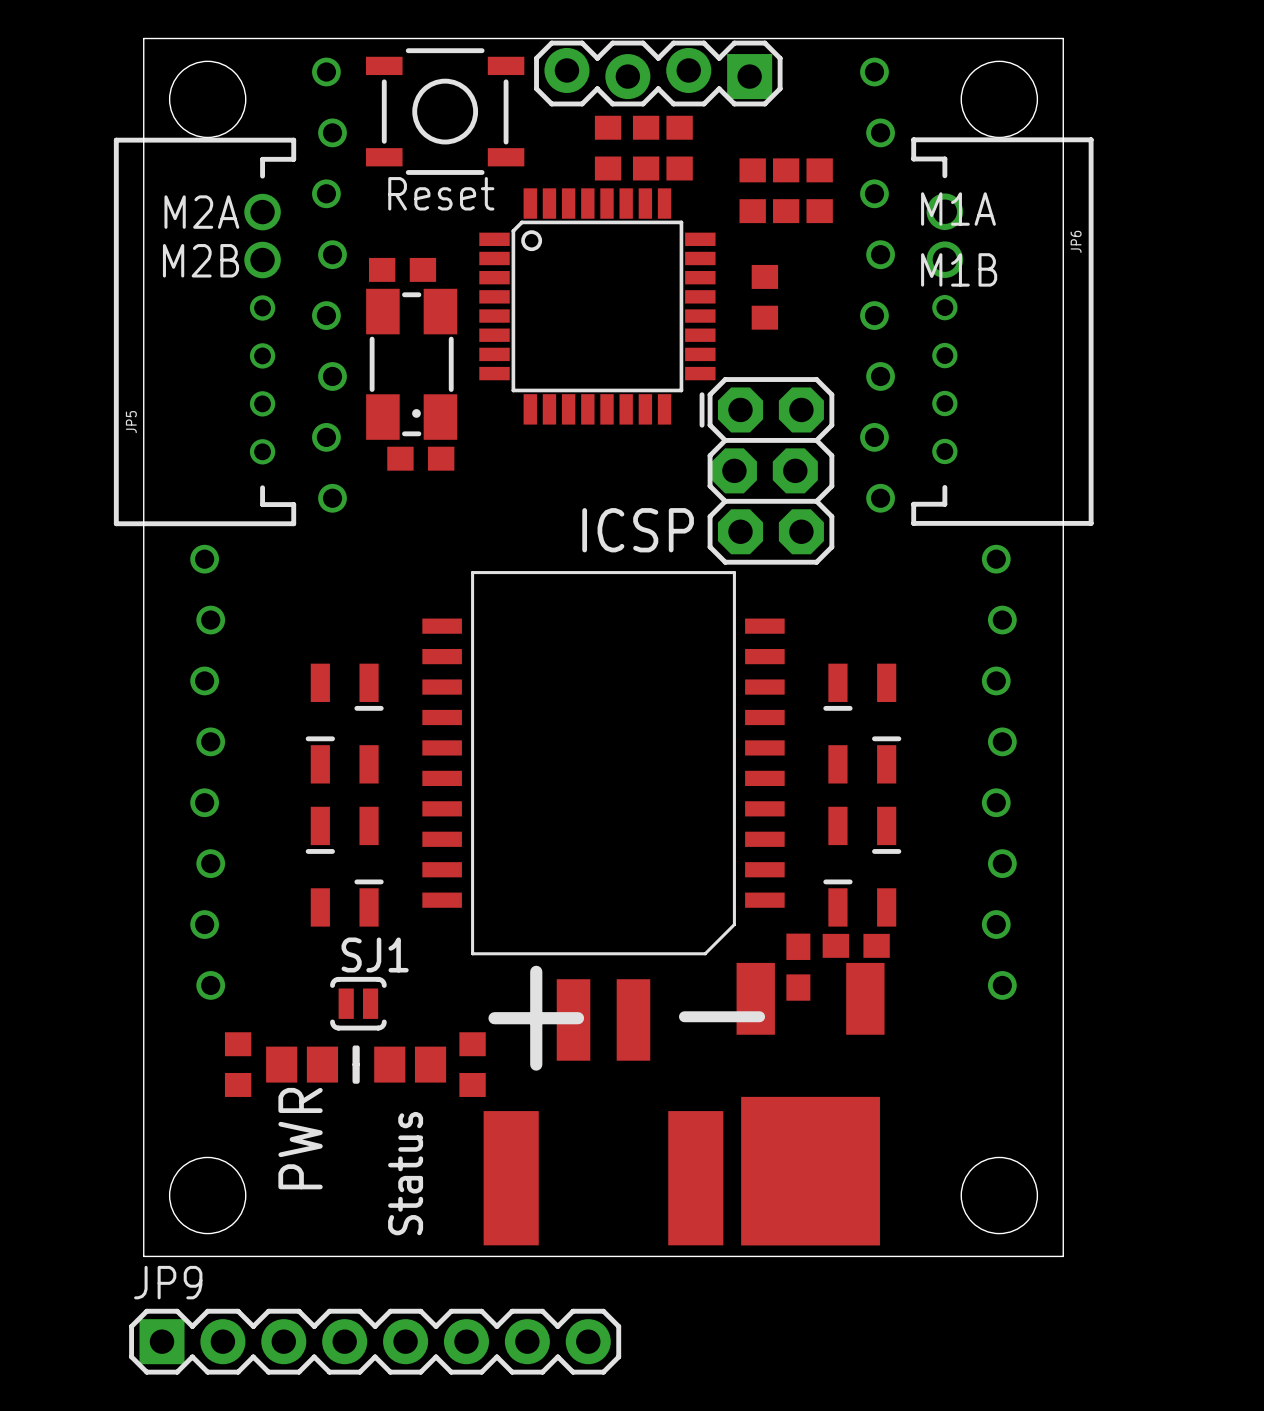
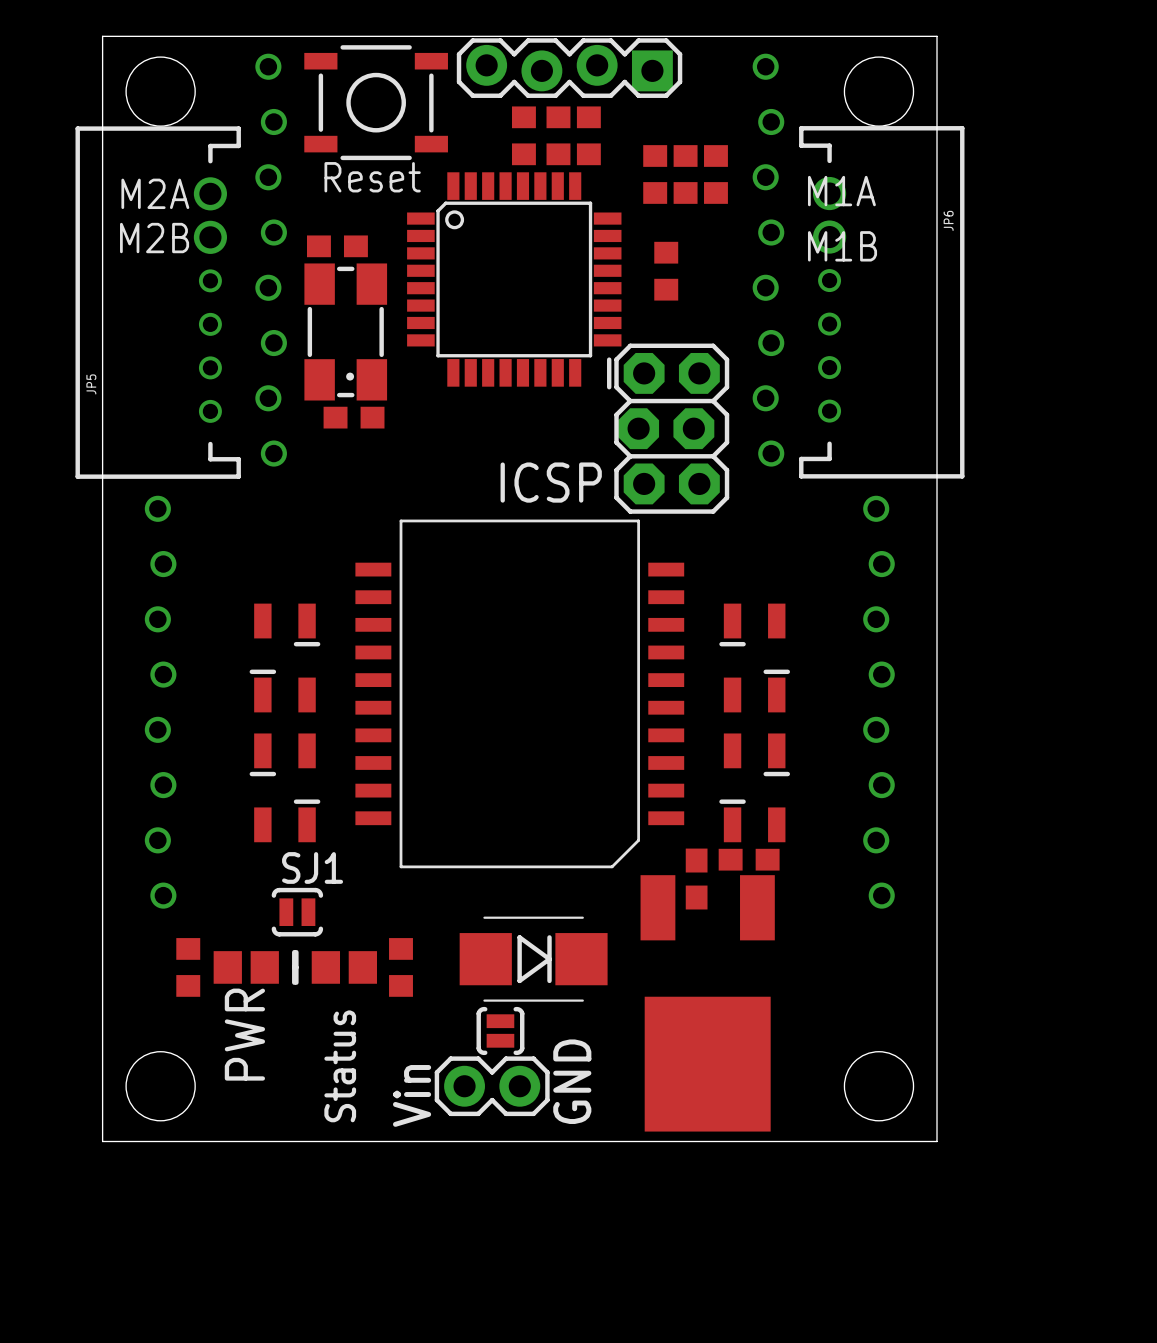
text: - (722, 1016) -> none
text: + (536, 1018) -> none
part: none -> (533, 959)
part: (603, 1112) -> none
part: none -> (500, 1030)
text: none -> GND (572, 1081)
part: none -> (492, 1086)
text: none -> Vin (412, 1095)
JP9: (375, 1341) -> none

